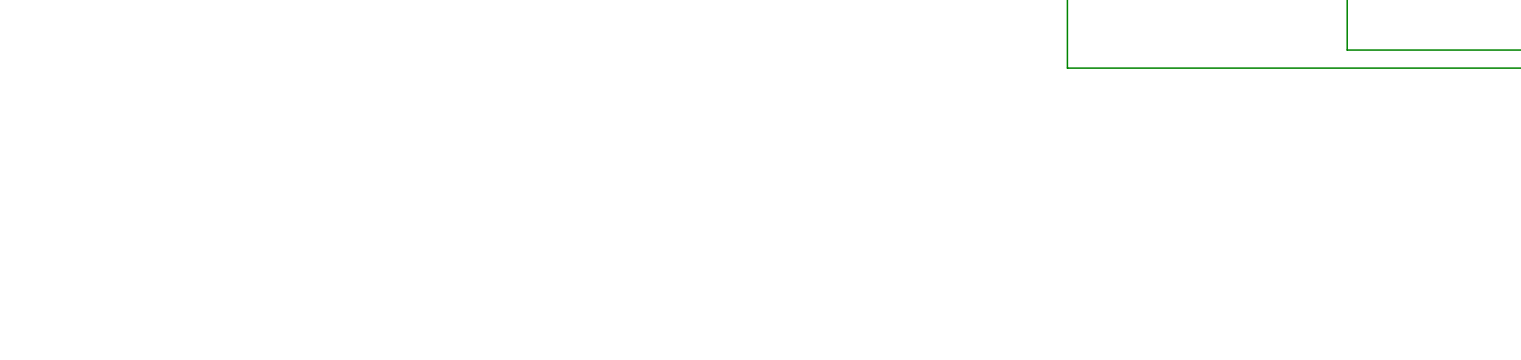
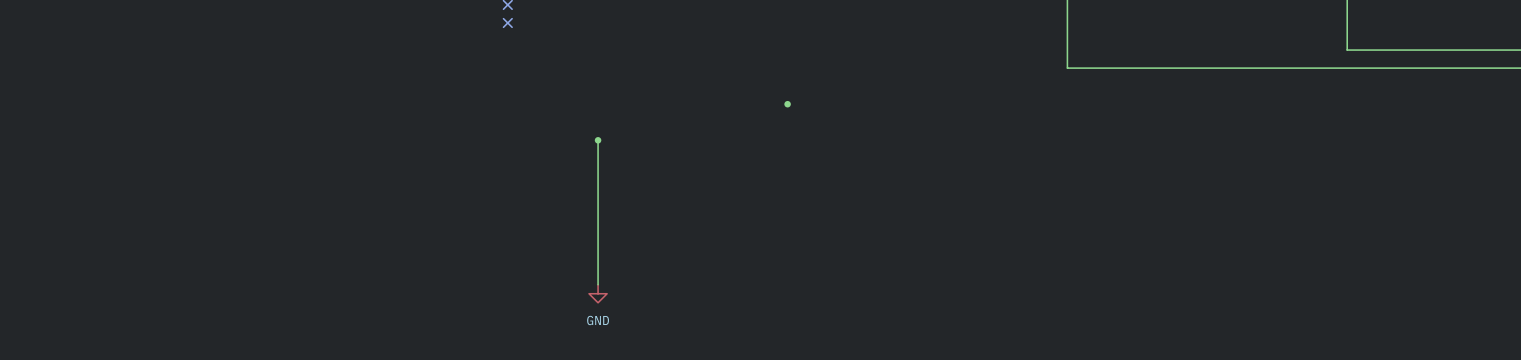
no-connect mark: none -> (507, 4)
no-connect mark: none -> (507, 22)
junction: none -> (787, 104)
wire: none -> (598, 140) (598, 284)
junction: none -> (598, 140)
power symbol: none -> GND (598, 293)

